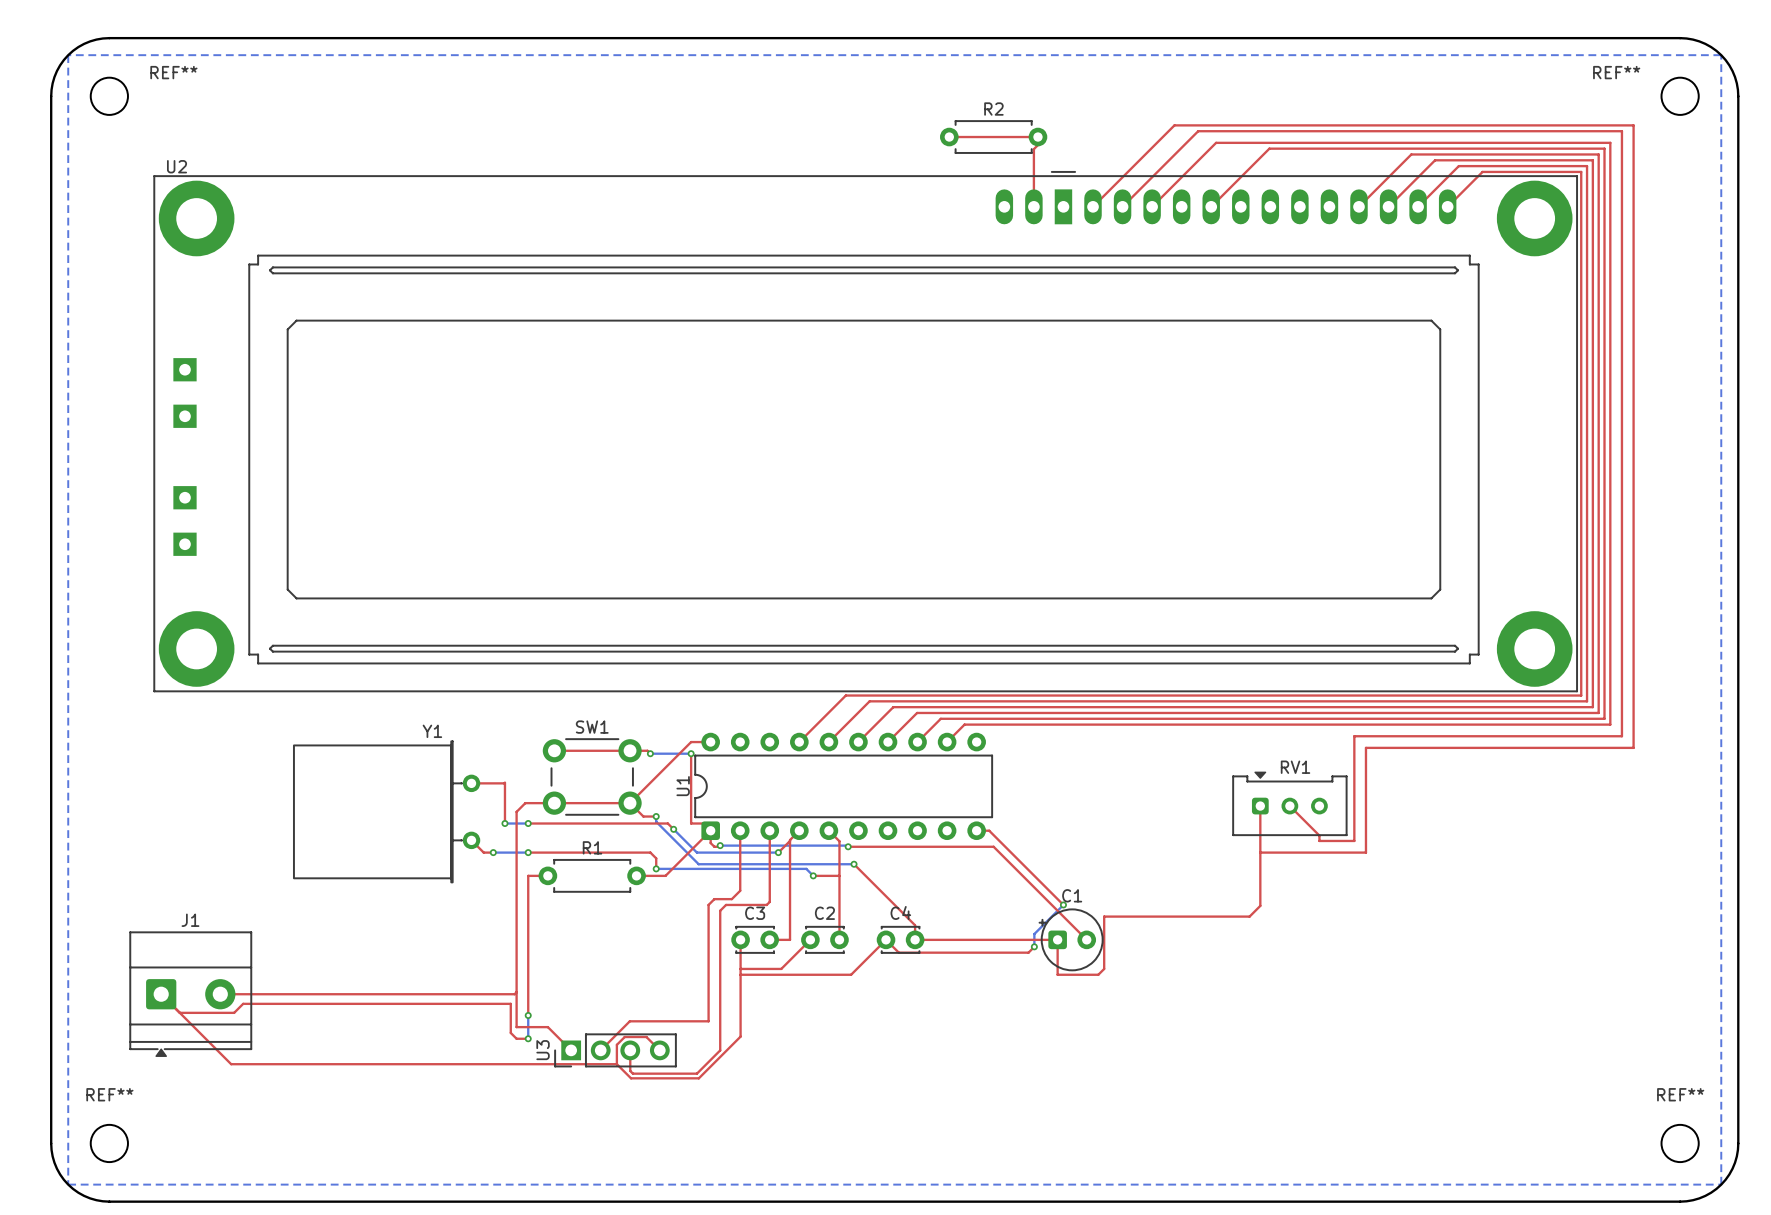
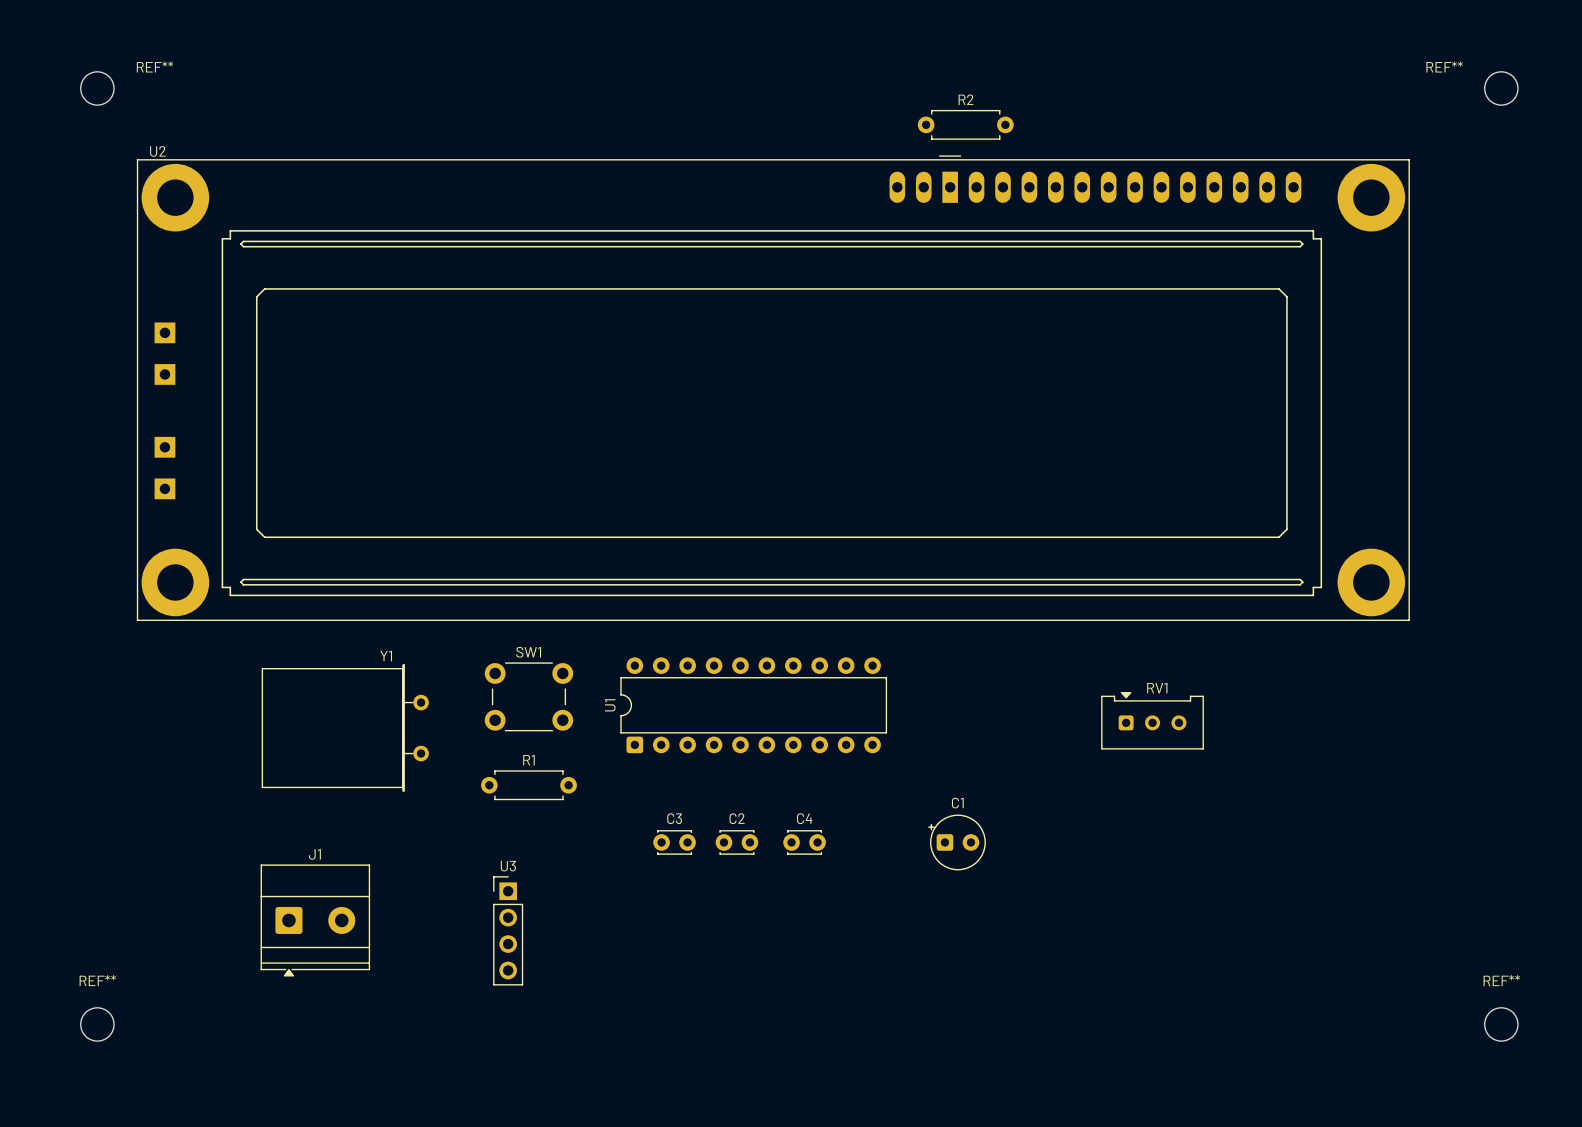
board edge: (109, 38) (1680, 38) (1693, 39) (1711, 47) (1721, 55) (1732, 71) (1738, 96) (1738, 1143) (1736, 1156) (1729, 1174) (1711, 1192) (1699, 1198) (1680, 1201) (109, 1201) (96, 1200) (78, 1192) (60, 1174) (54, 1162) (51, 1143) (51, 96) (54, 77) (68, 55) (90, 41) (109, 38) -> none
bottom zone outline: (68, 55) (1721, 55) (1721, 1184) (68, 1184) (68, 55) -> none
top track: (949, 137) (1037, 137) (1037, 145) (1033, 149) (1033, 206) (1036, 204) -> none
R2 position: (993, 137) -> (965, 124)
top track: (1093, 206) (1174, 125) (1633, 125) (1633, 747) (1365, 747) (1365, 852) (1260, 852) -> none
top track: (1122, 206) (1198, 131) (1621, 131) (1621, 736) (1354, 736) (1354, 840) (1319, 840) (1319, 835) (1289, 806) -> none
top track: (1152, 206) (1216, 142) (1610, 142) (1610, 724) (964, 724) (947, 742) -> none
top track: (1211, 206) (1269, 148) (1604, 148) (1604, 718) (940, 718) (917, 742) -> none
top track: (1358, 206) (1411, 154) (1598, 154) (1598, 712) (917, 712) (888, 742) -> none
top track: (1388, 206) (1435, 160) (1592, 160) (1592, 707) (893, 707) (858, 742) -> none
top track: (1418, 206) (1458, 166) (1587, 166) (1587, 701) (869, 701) (828, 742) -> none
top track: (1447, 206) (1482, 171) (1581, 171) (1581, 695) (845, 695) (799, 742) -> none
top track: (710, 742) (691, 742) (630, 803) -> none
top track: (554, 750) (647, 750) (650, 753) -> none
bottom track: (650, 753) (691, 753) -> none
via: (650, 753) -> none
top track: (691, 753) (691, 823) (703, 823) (710, 830) -> none
via: (691, 753) -> none
top track: (471, 783) (504, 782) (504, 823) -> none
top track: (630, 803) (643, 816) (656, 816) -> none
top track: (630, 803) (525, 803) (516, 811) (516, 1027) (547, 1027) (571, 1050) -> none
top track: (1260, 806) (1260, 905) (1249, 916) (1104, 916) (1104, 968) (1098, 974) (1057, 974) (1057, 939) (915, 939) (915, 925) (854, 864) -> none
bottom track: (656, 816) (656, 821) (698, 864) (854, 864) -> none
via: (656, 816) -> none
bottom track: (504, 823) (528, 823) -> none
via: (504, 823) -> none
top track: (528, 823) (667, 823) (673, 829) -> none
via: (528, 823) -> none
bottom track: (673, 829) (696, 852) (778, 852) -> none
via: (673, 829) -> none
top track: (710, 830) (665, 875) (636, 875) -> none
top track: (710, 830) (710, 843) (714, 846) (720, 845) -> none
top track: (740, 830) (740, 890) (731, 899) (714, 899) (708, 904) (708, 1021) (629, 1021) (600, 1050) -> none
top track: (769, 830) (769, 901) (766, 904) (726, 904) (720, 910) (720, 1050) (696, 1073) (632, 1073) (630, 1070) (630, 1050) -> none
top track: (799, 830) (790, 840) (790, 939) (769, 939) -> none
top track: (828, 830) (839, 841) (839, 939) -> none
top track: (976, 830) (989, 830) (1063, 904) -> none
top track: (471, 840) (483, 852) (493, 852) -> none
top track: (790, 840) (778, 852) -> none
bottom track: (720, 845) (848, 846) -> none
via: (720, 845) -> none
top track: (848, 846) (993, 846) (1086, 939) -> none
via: (848, 846) -> none
bottom track: (493, 852) (528, 852) -> none
via: (493, 852) -> none
top track: (528, 852) (650, 852) (656, 858) (656, 868) -> none
via: (528, 852) -> none
via: (778, 852) -> none
via: (854, 864) -> none
bottom track: (656, 868) (806, 868) (813, 875) -> none
via: (656, 868) -> none
top track: (547, 875) (528, 875) (528, 1015) -> none
top track: (813, 875) (839, 875) -> none
via: (813, 875) -> none
bottom track: (1063, 904) (1034, 934) (1034, 946) -> none
via: (1063, 904) -> none
top track: (740, 939) (740, 1036) (698, 1078) (631, 1078) (616, 1064) -> none
top track: (810, 939) (781, 968) (740, 968) -> none
top track: (1034, 946) (1028, 952) (898, 952) (886, 939) (851, 974) (740, 974) -> none
via: (1034, 946) -> none
top track: (516, 992) (514, 994) (220, 994) -> none
top track: (161, 994) (231, 1064) (616, 1064) -> none
J1 position: (190, 994) -> (315, 920)
top track: (179, 1012) (234, 1012) (243, 1003) (510, 1003) (510, 1032) (516, 1038) (528, 1038) -> none
bottom track: (528, 1015) (528, 1038) -> none
via: (528, 1015) -> none
via: (528, 1038) -> none
U3 rotation: 0° (615, 1050) -> 90° clockwise (508, 930)
top track: (659, 1050) (646, 1037) (624, 1037) (616, 1044) (616, 1064) -> none

